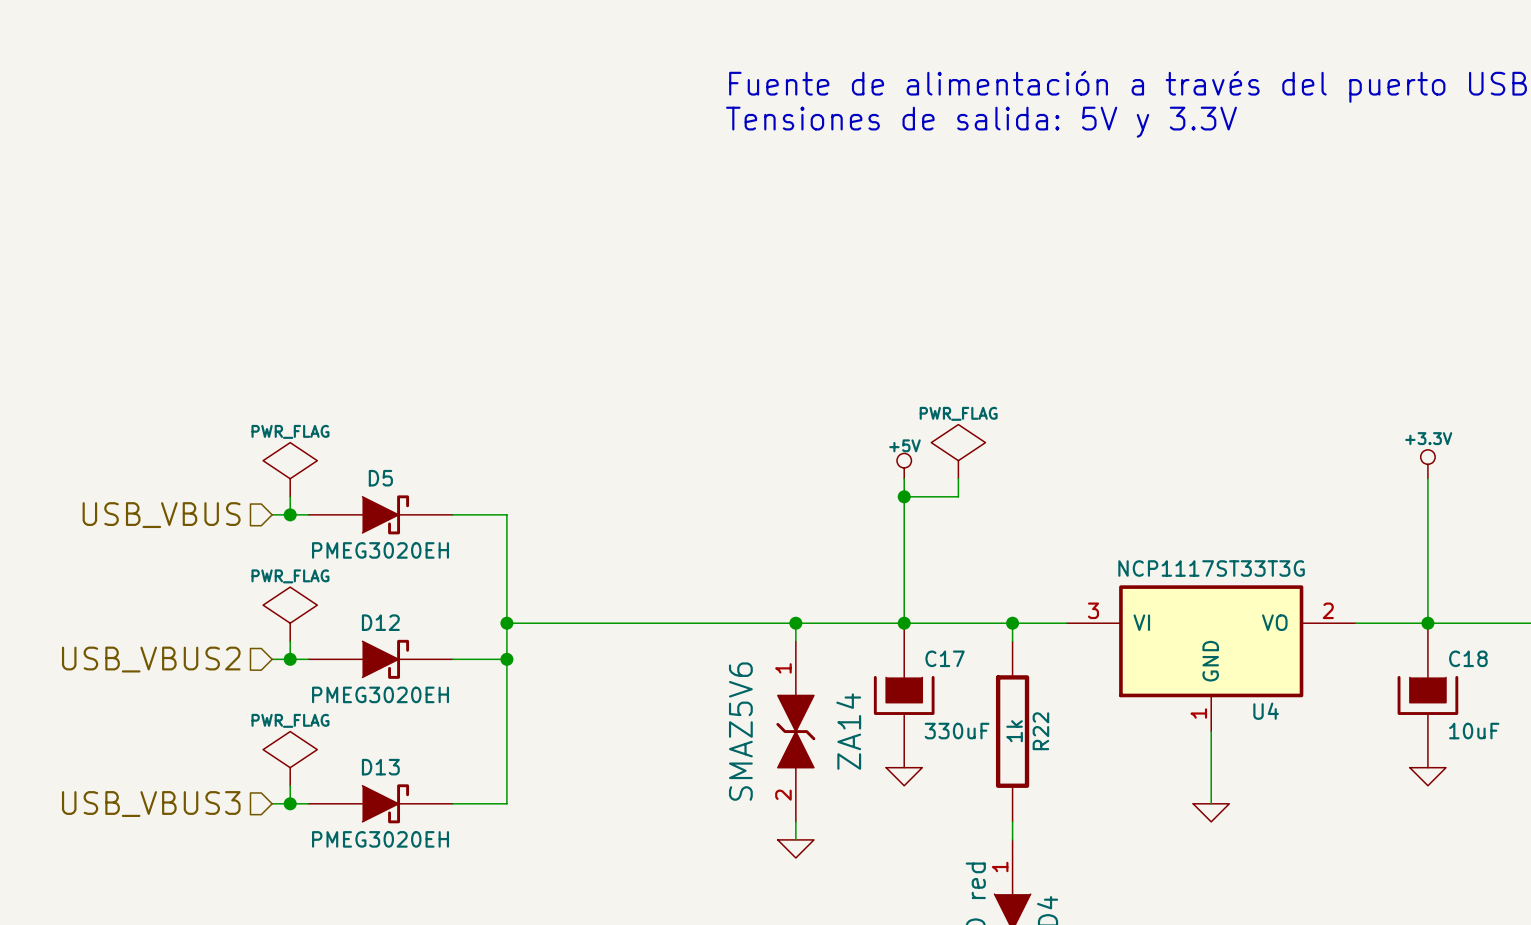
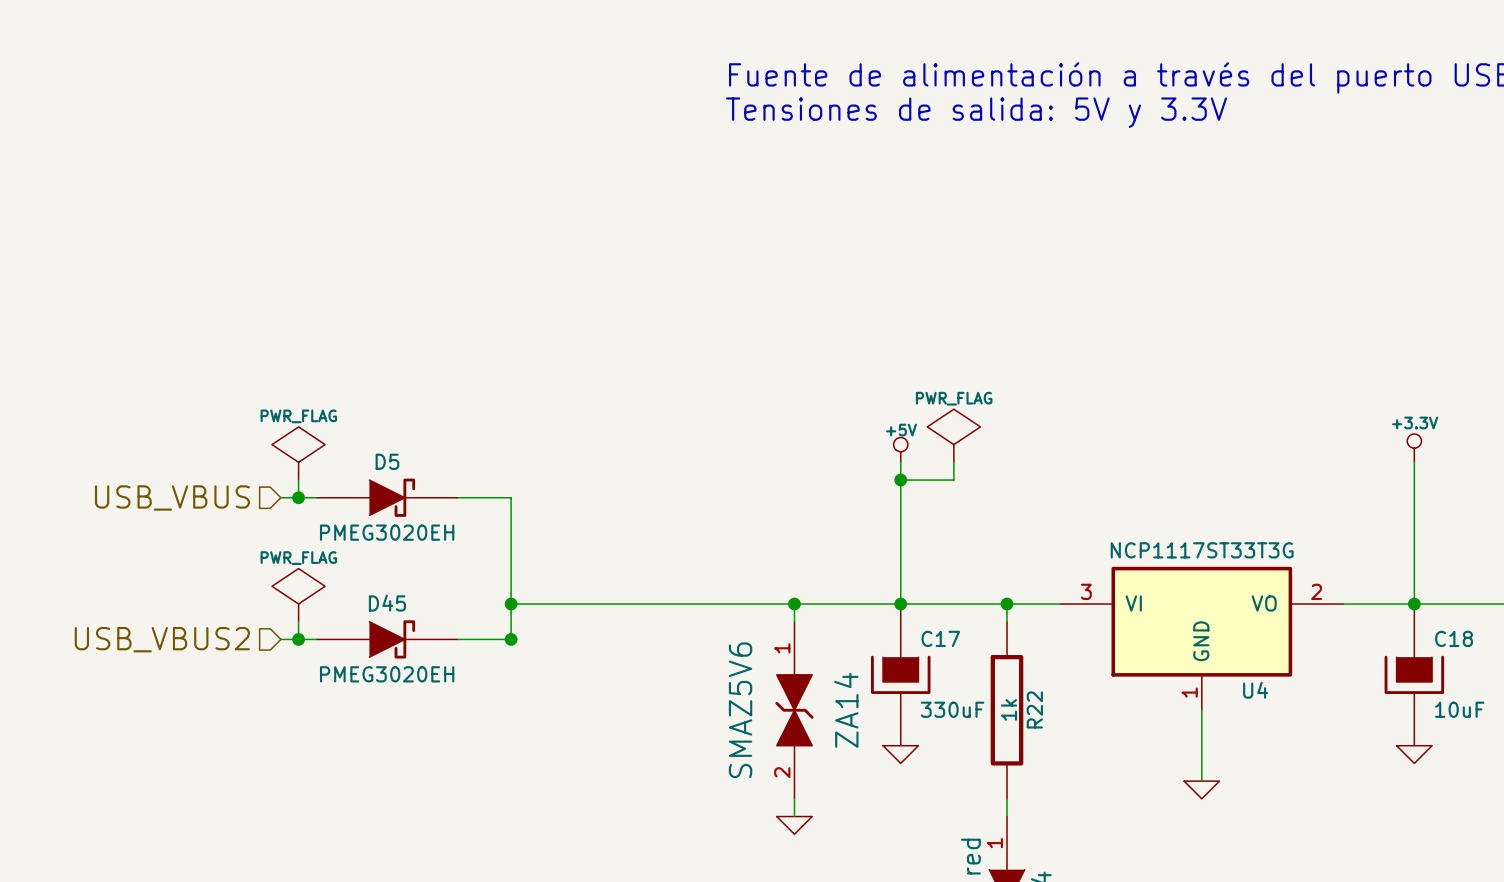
D12 name: D12 (380, 622) -> D45 (387, 603)
wire: (506, 659) (506, 803) (452, 803) -> none
power symbol: PWR_FLAG (290, 758) -> none
wire: (290, 785) (290, 803) -> none
wire: (272, 803) (308, 803) -> none
junction: (290, 803) -> none
D13: PMEG3020EH (380, 803) -> none
hierarchical label: USB_VBUS3 (151, 804) -> none

